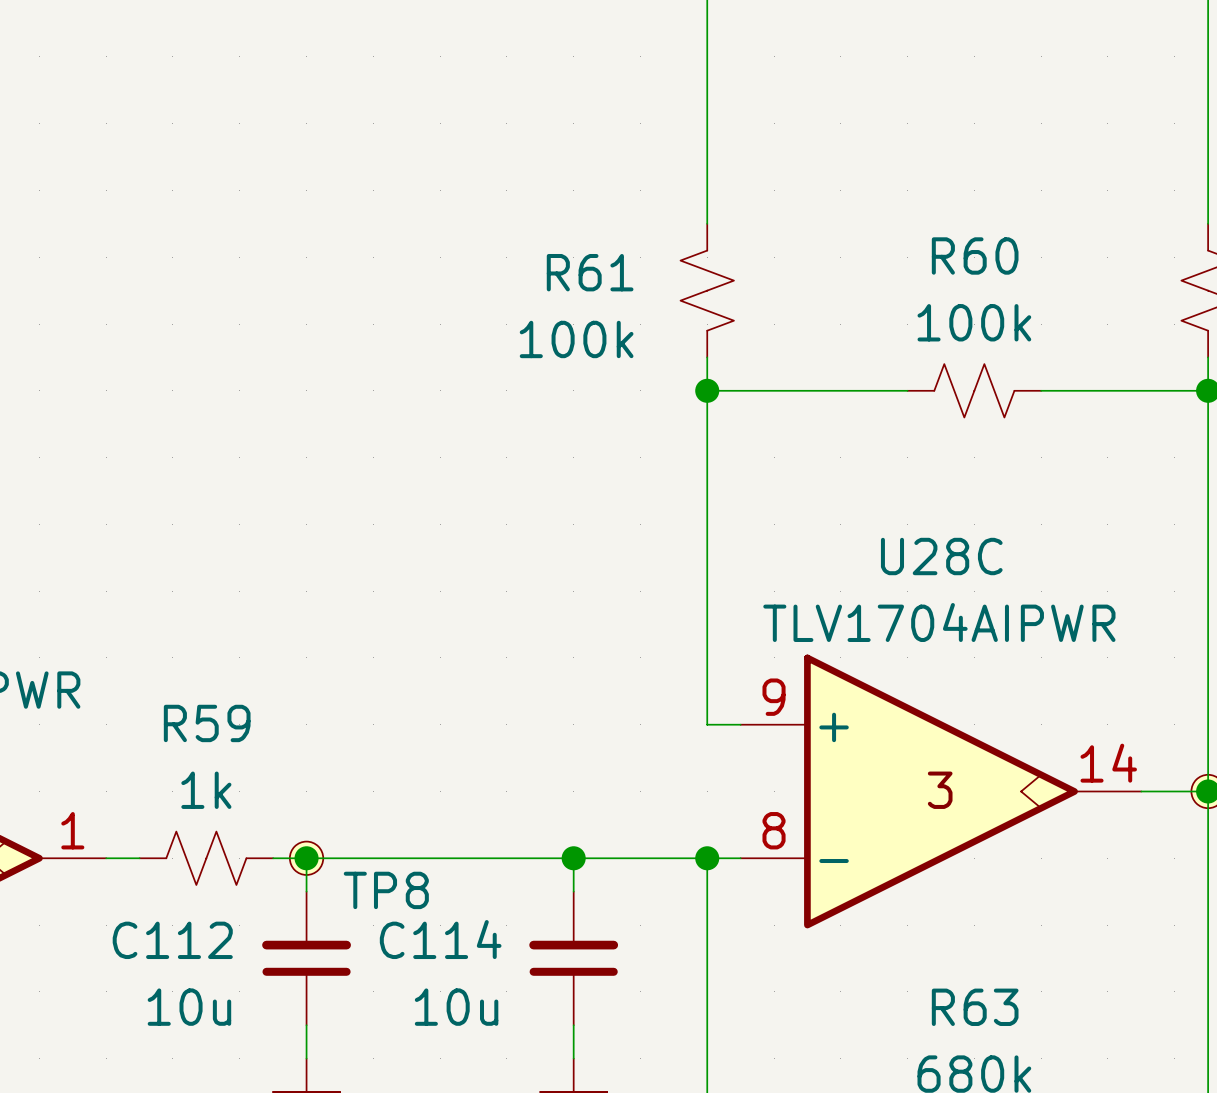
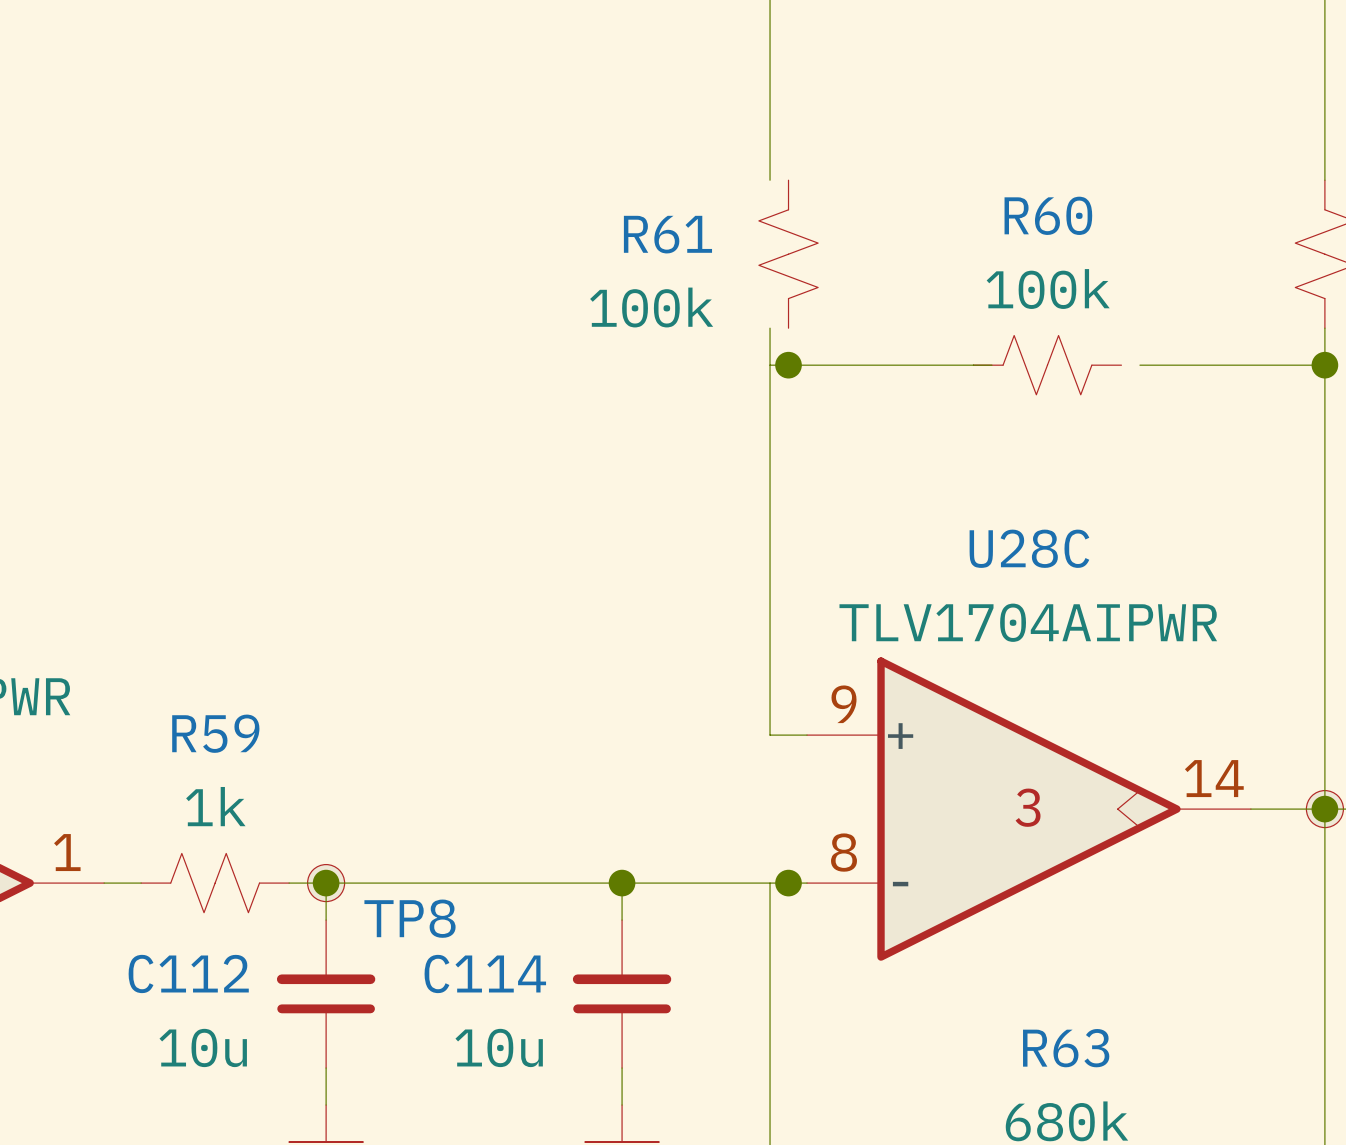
R61 position: (707, 290) -> (788, 254)
junction position: (707, 390) -> (788, 365)
R60 position: (974, 390) -> (1047, 365)
junction position: (707, 858) -> (788, 883)

